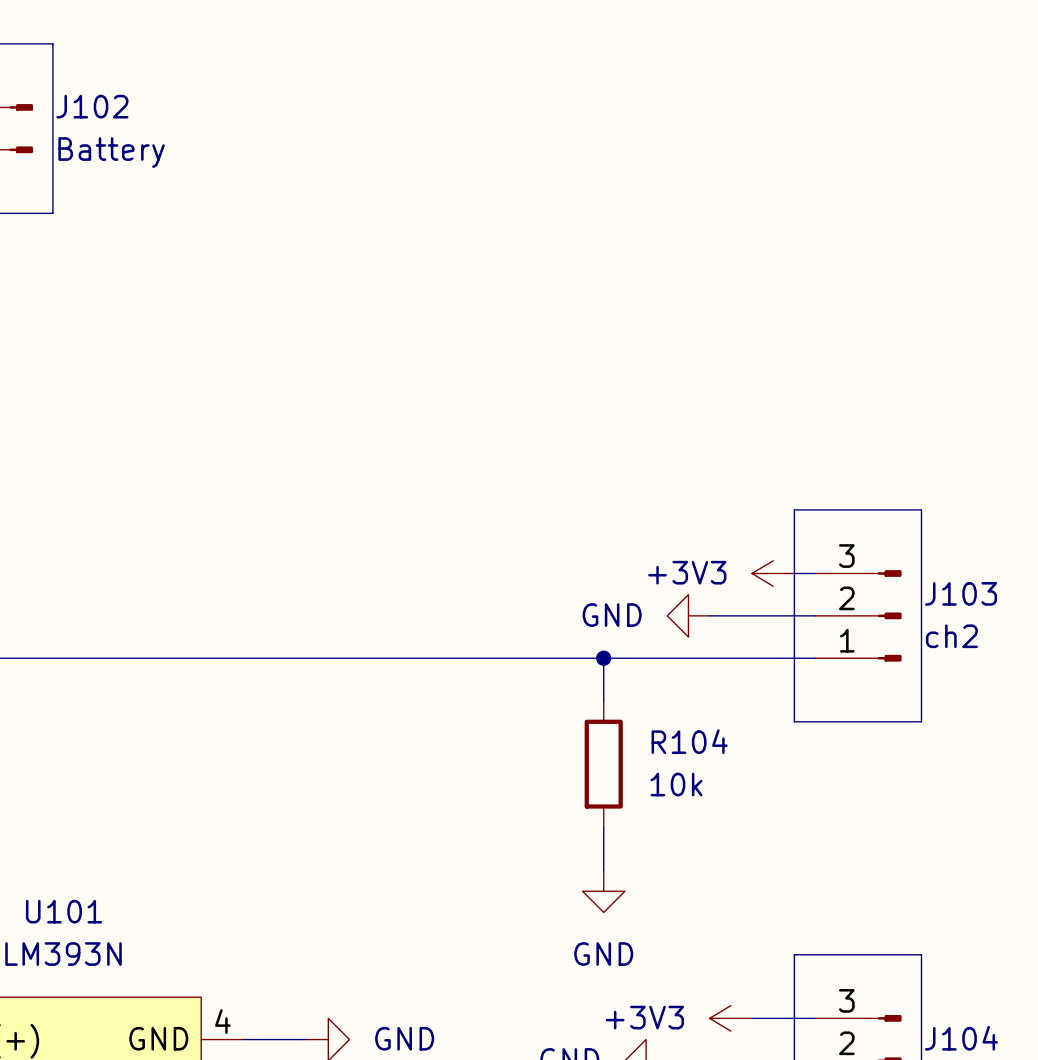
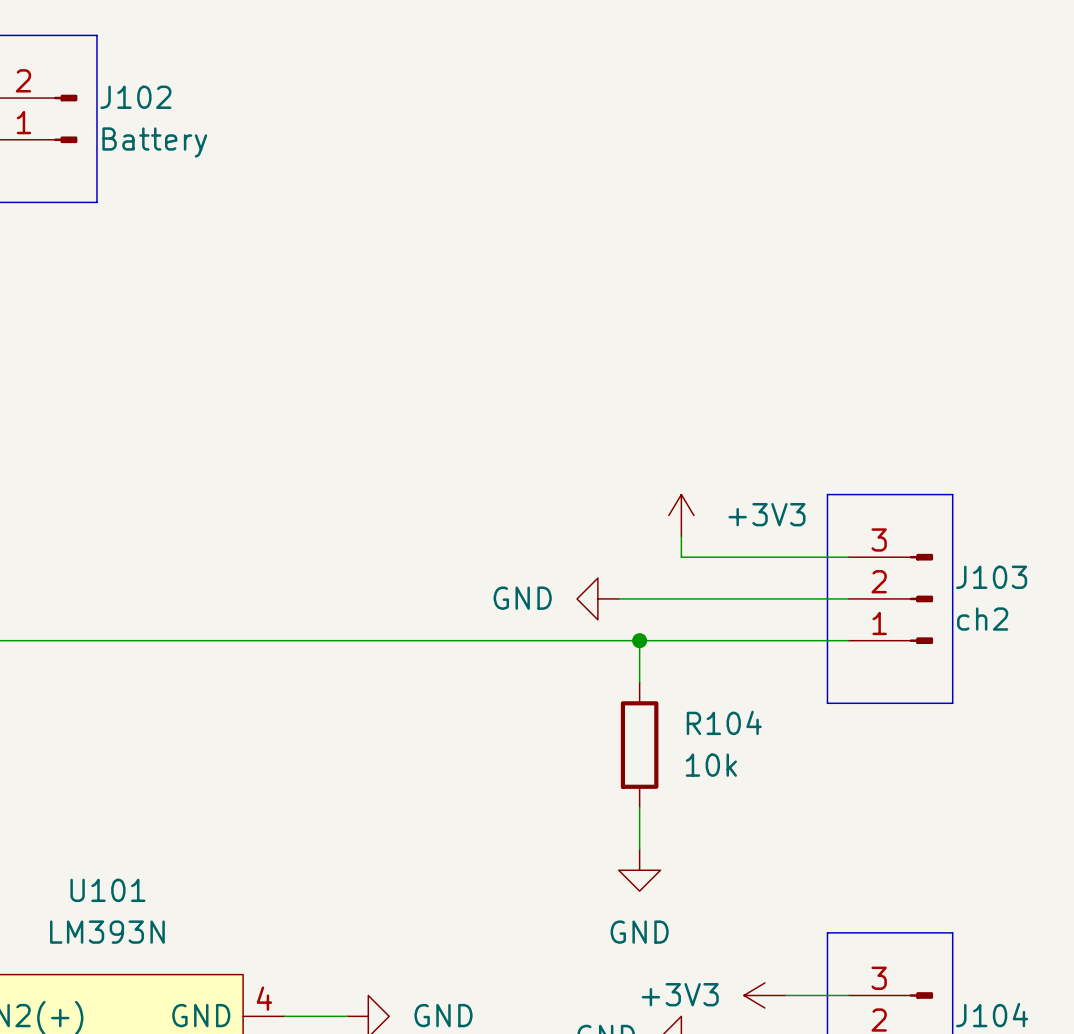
wire: none -> (681, 536) (681, 557) (827, 557)
power symbol text position: +3V3 (687, 572) -> +3V3 (767, 514)
power symbol rotation: 0° (773, 573) -> 90° clockwise (681, 515)
power symbol position: +3V3 (773, 573) -> +3V3 (681, 515)
wire: none -> (618, 598) (743, 598)
power symbol position: GND (688, 615) -> GND (597, 598)

